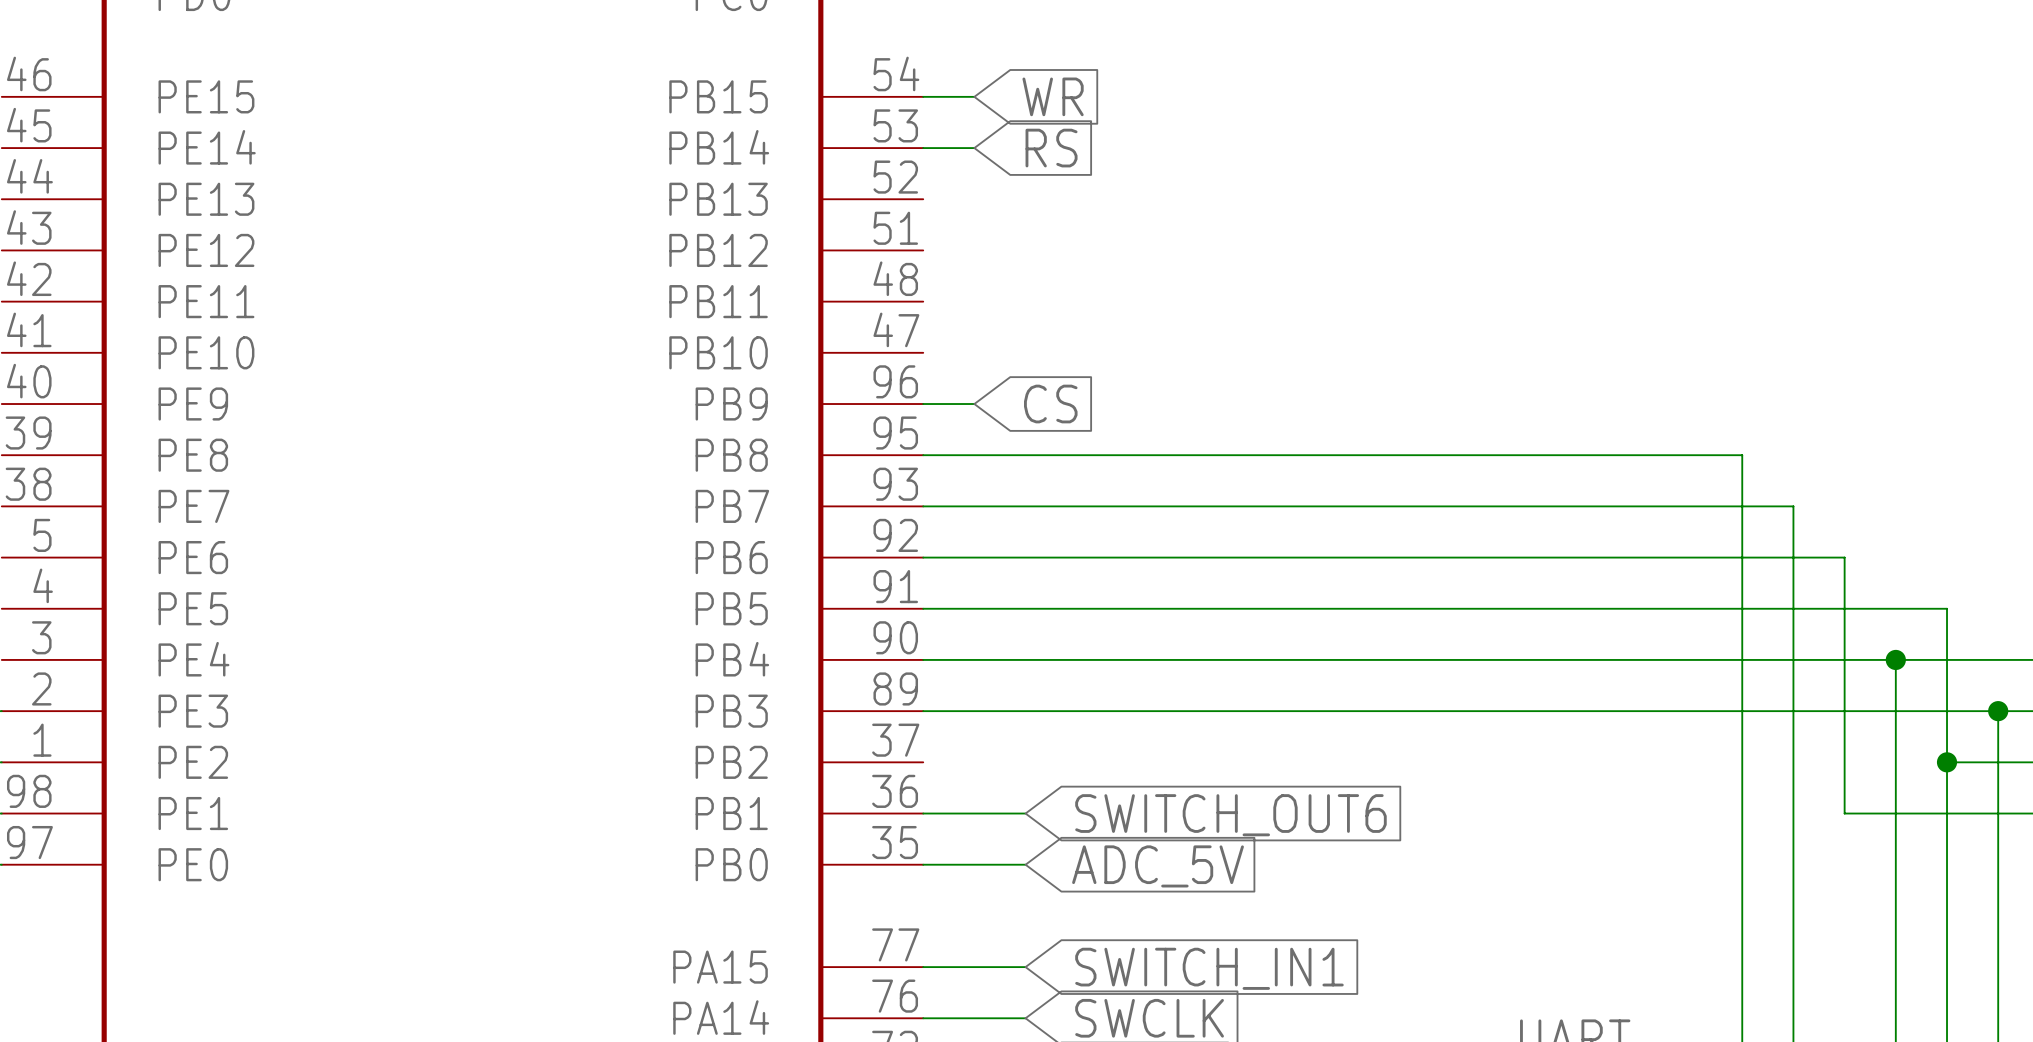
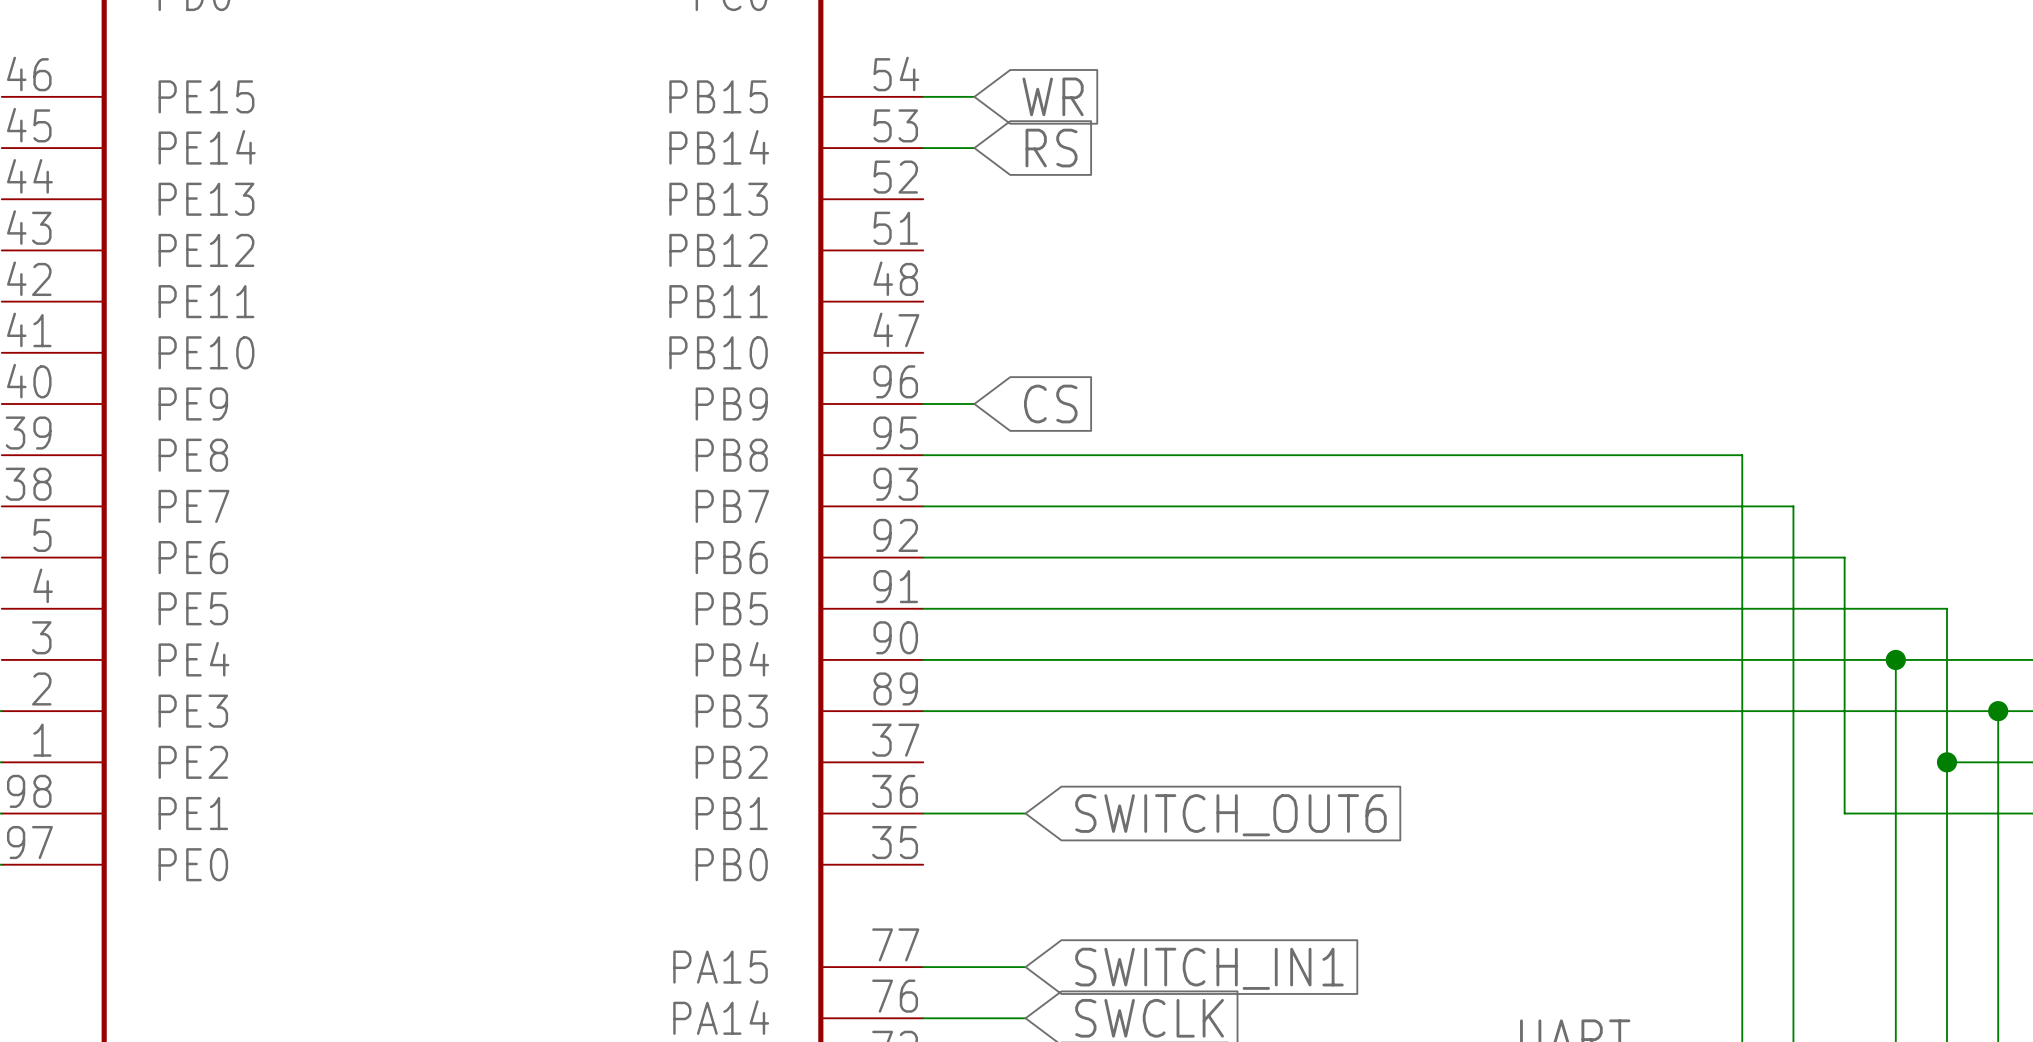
wire: (923, 864) (1025, 864) -> none
global label: ADC_5V (1158, 866) -> none

